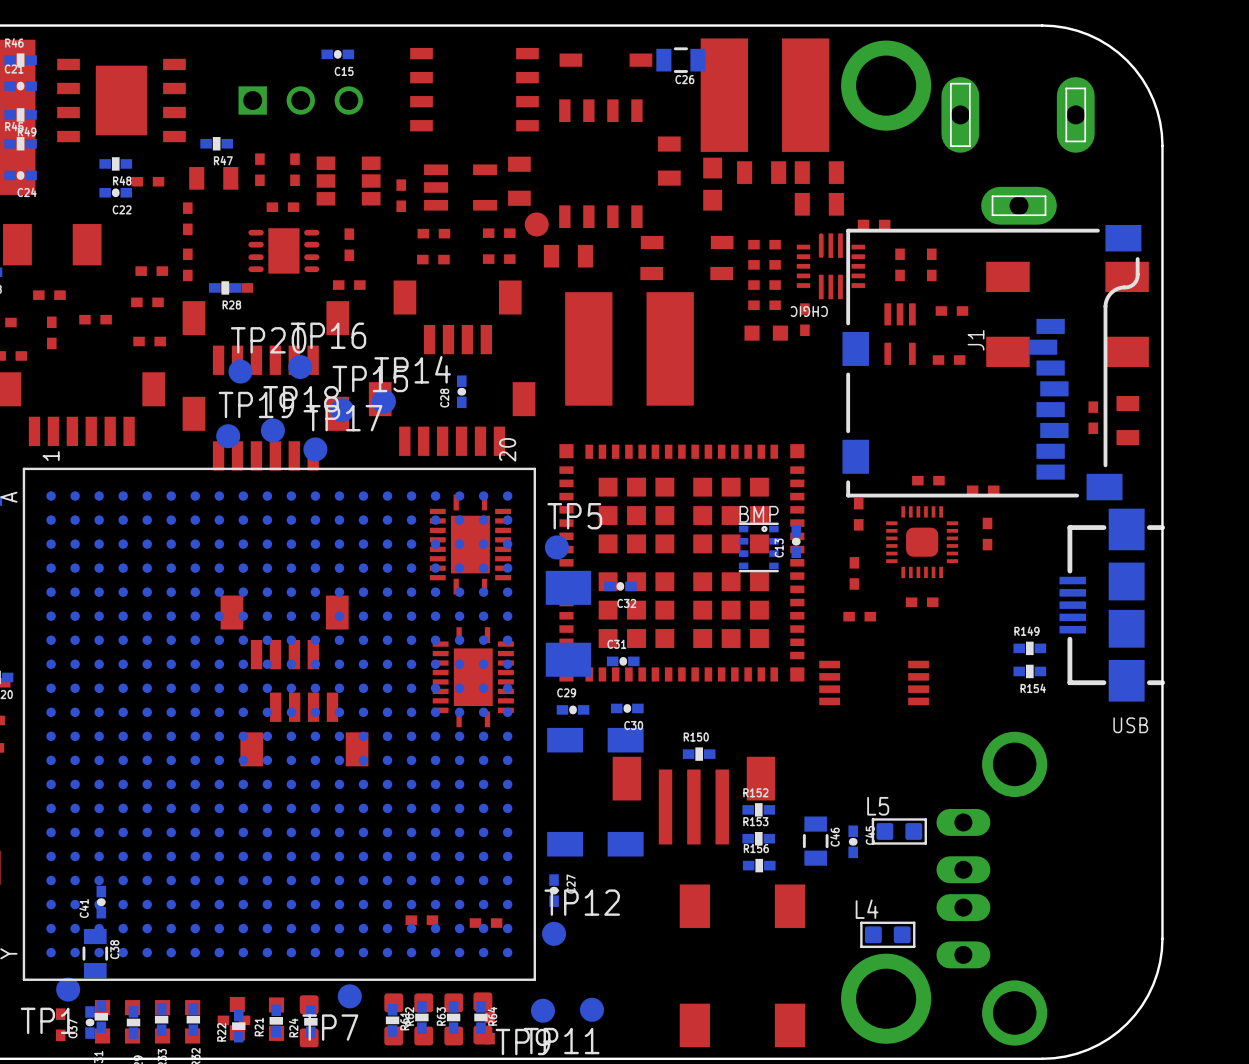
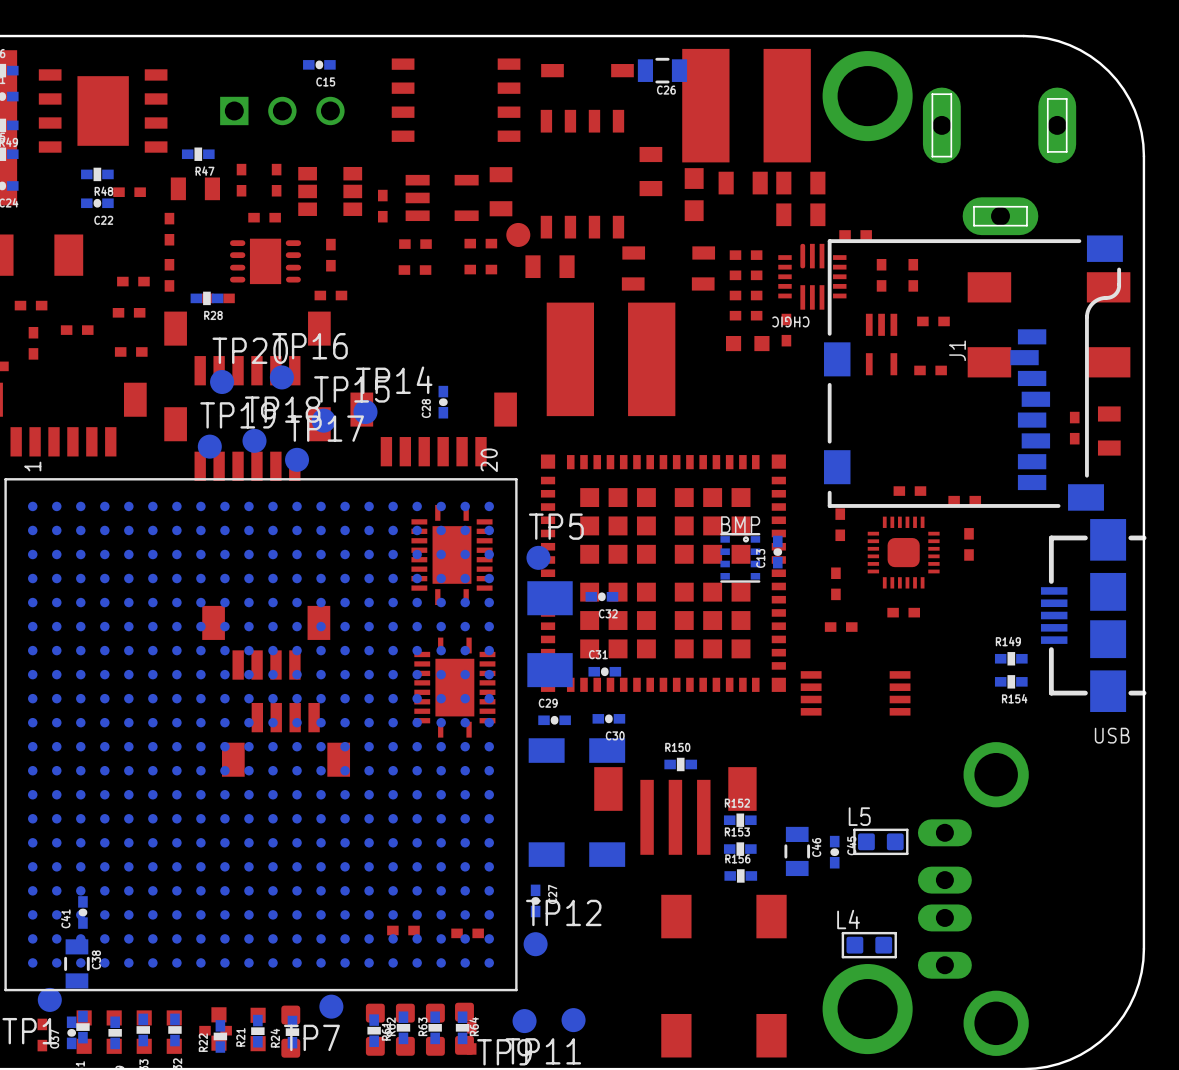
part: (457, 317) -> none

